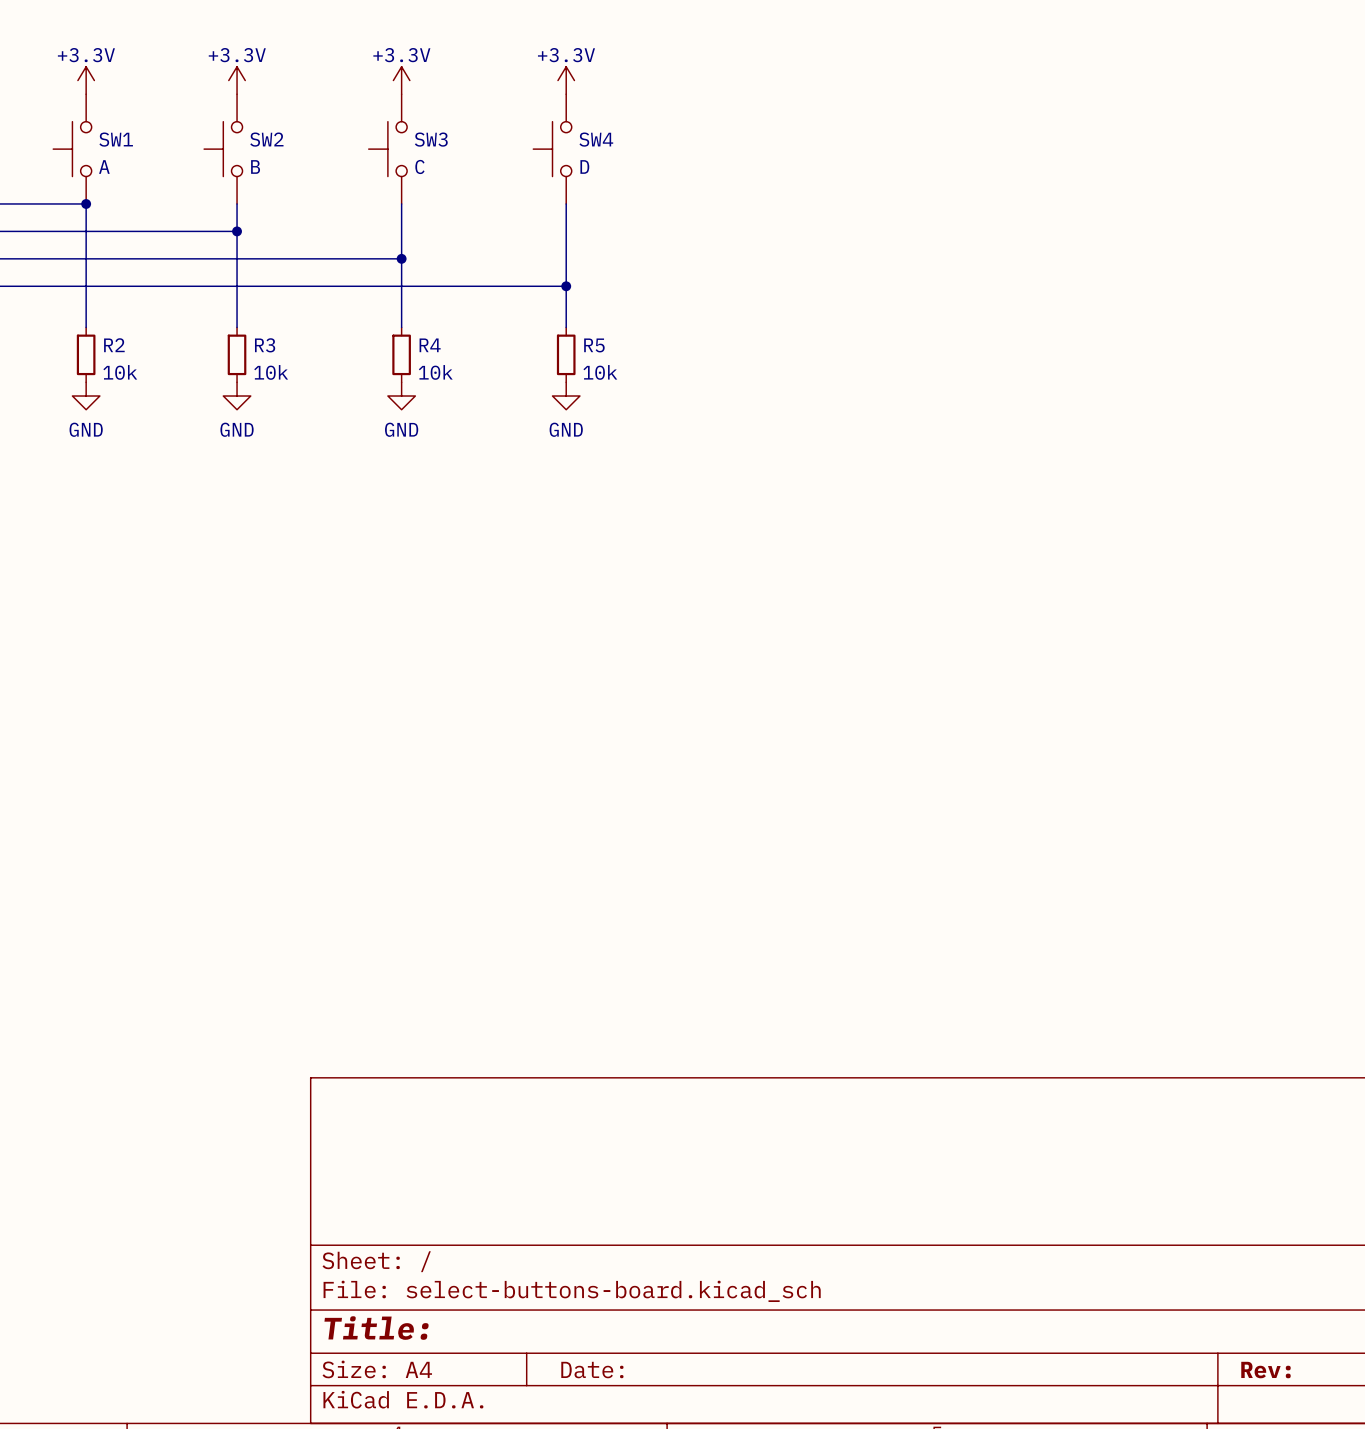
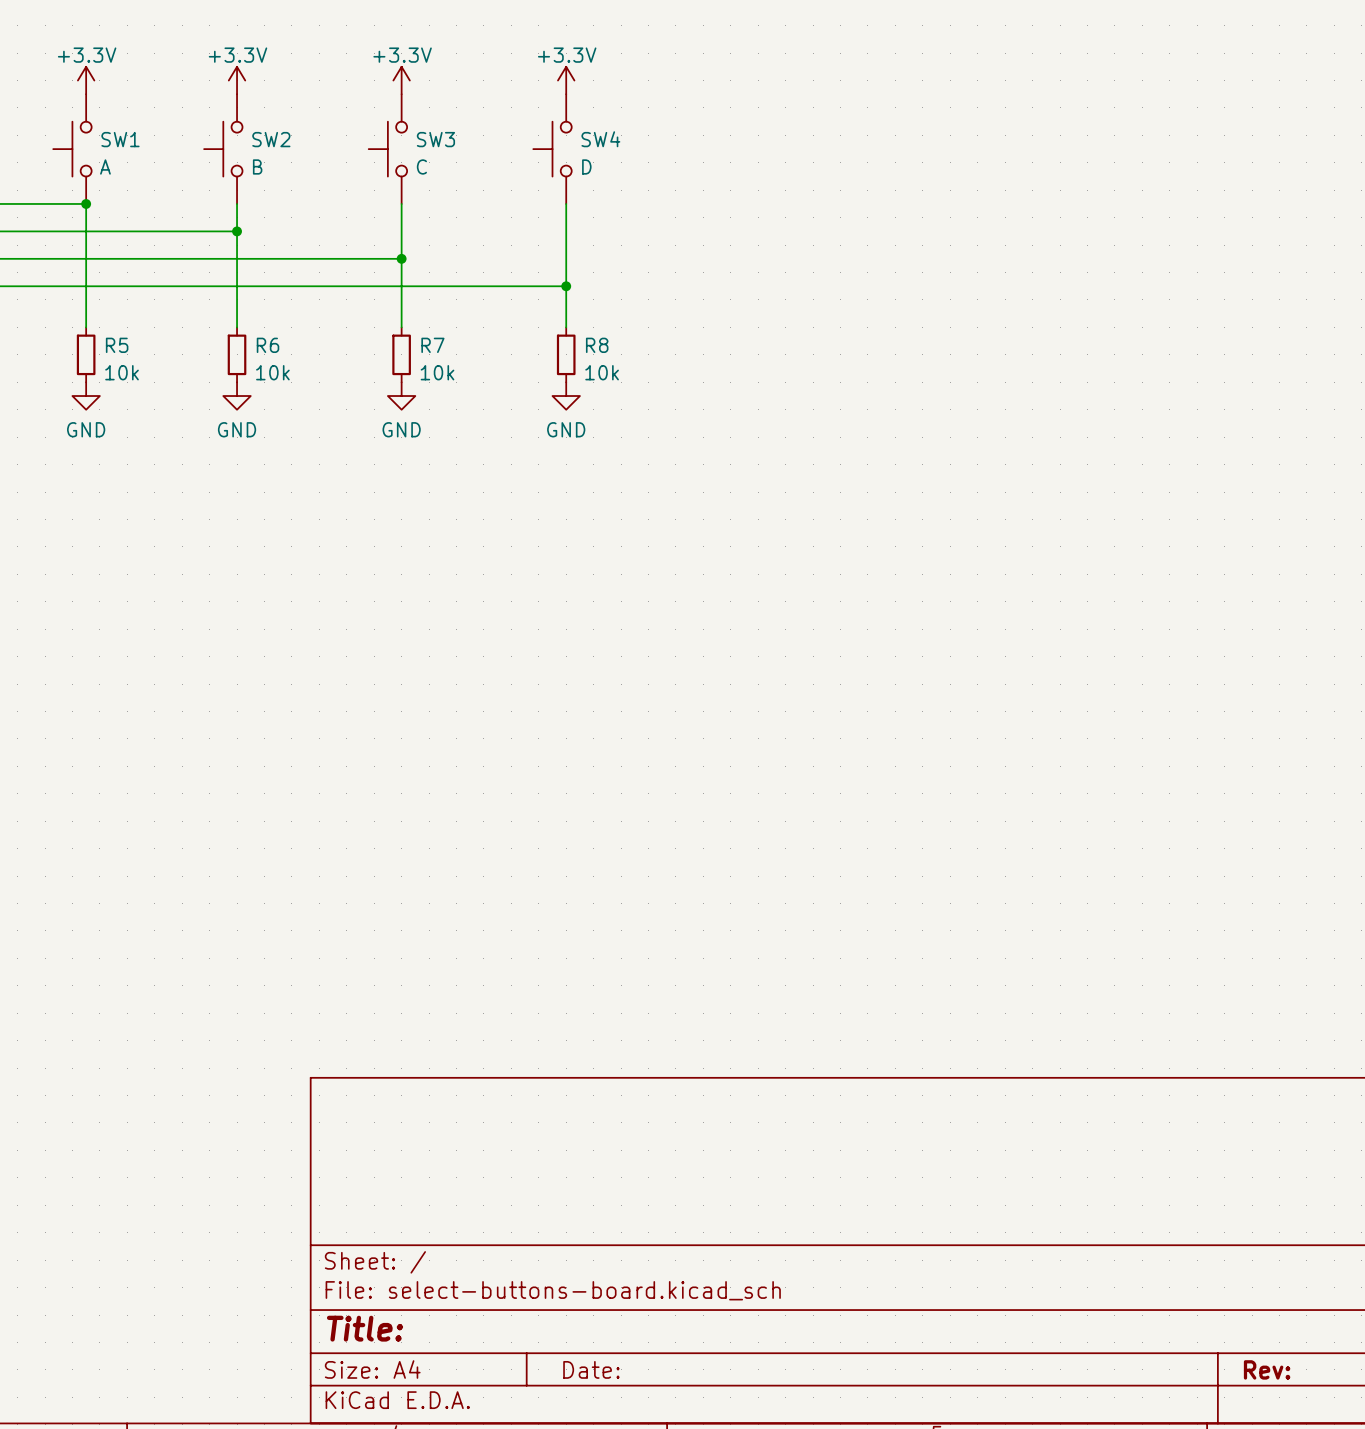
R2 name: R2 (114, 345) -> R5 (117, 345)
R3 name: R3 (265, 345) -> R6 (268, 345)
R4 name: R4 (430, 345) -> R7 (432, 345)
R5 name: R5 (594, 345) -> R8 (597, 345)

